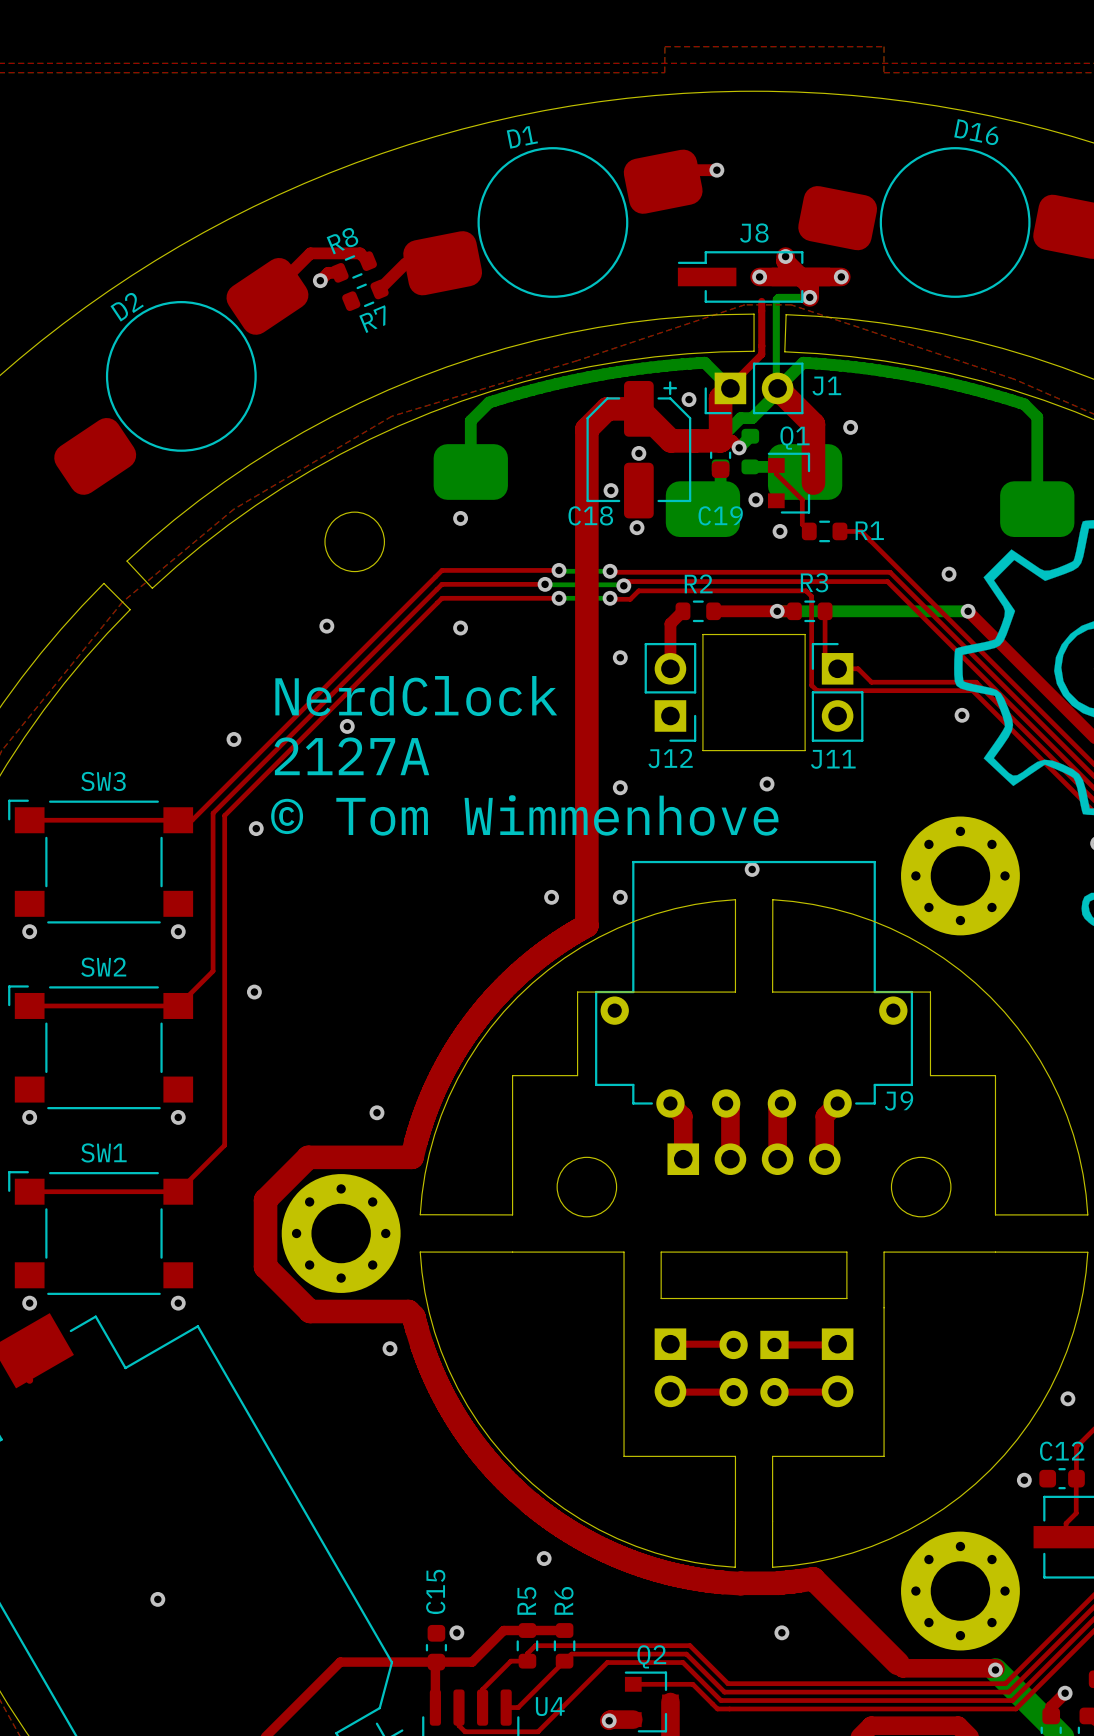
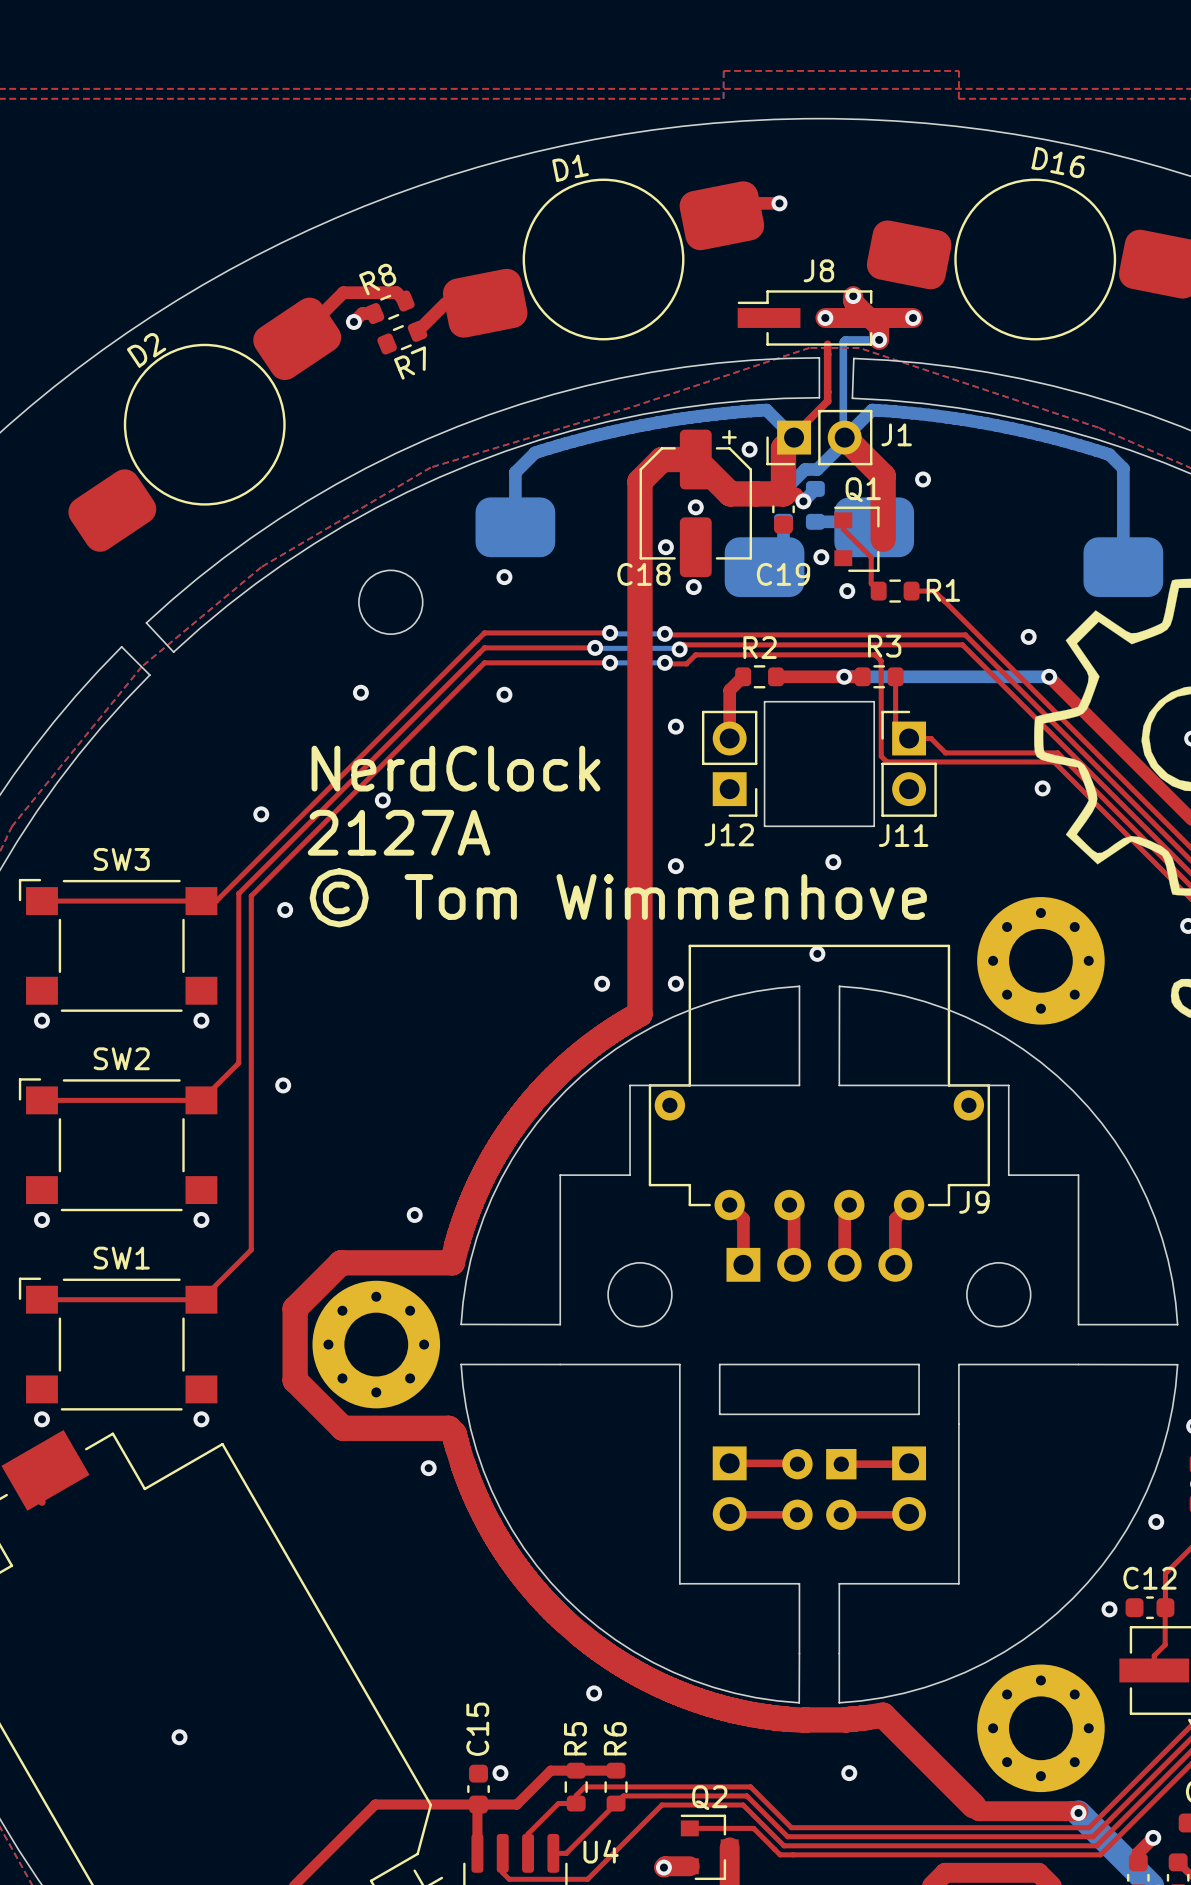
top track width: thick (670, 1103) (683, 1116) (683, 1159) -> thin (729, 1205) (743, 1218) (743, 1264)
top track width: thick (726, 1103) (730, 1107) (730, 1159) -> thin (789, 1205) (794, 1209) (794, 1264)
top track width: thick (781, 1103) (777, 1107) (777, 1159) -> thin (849, 1205) (844, 1209) (844, 1264)
top track width: thick (837, 1103) (824, 1116) (824, 1159) -> thin (909, 1205) (895, 1218) (895, 1264)

